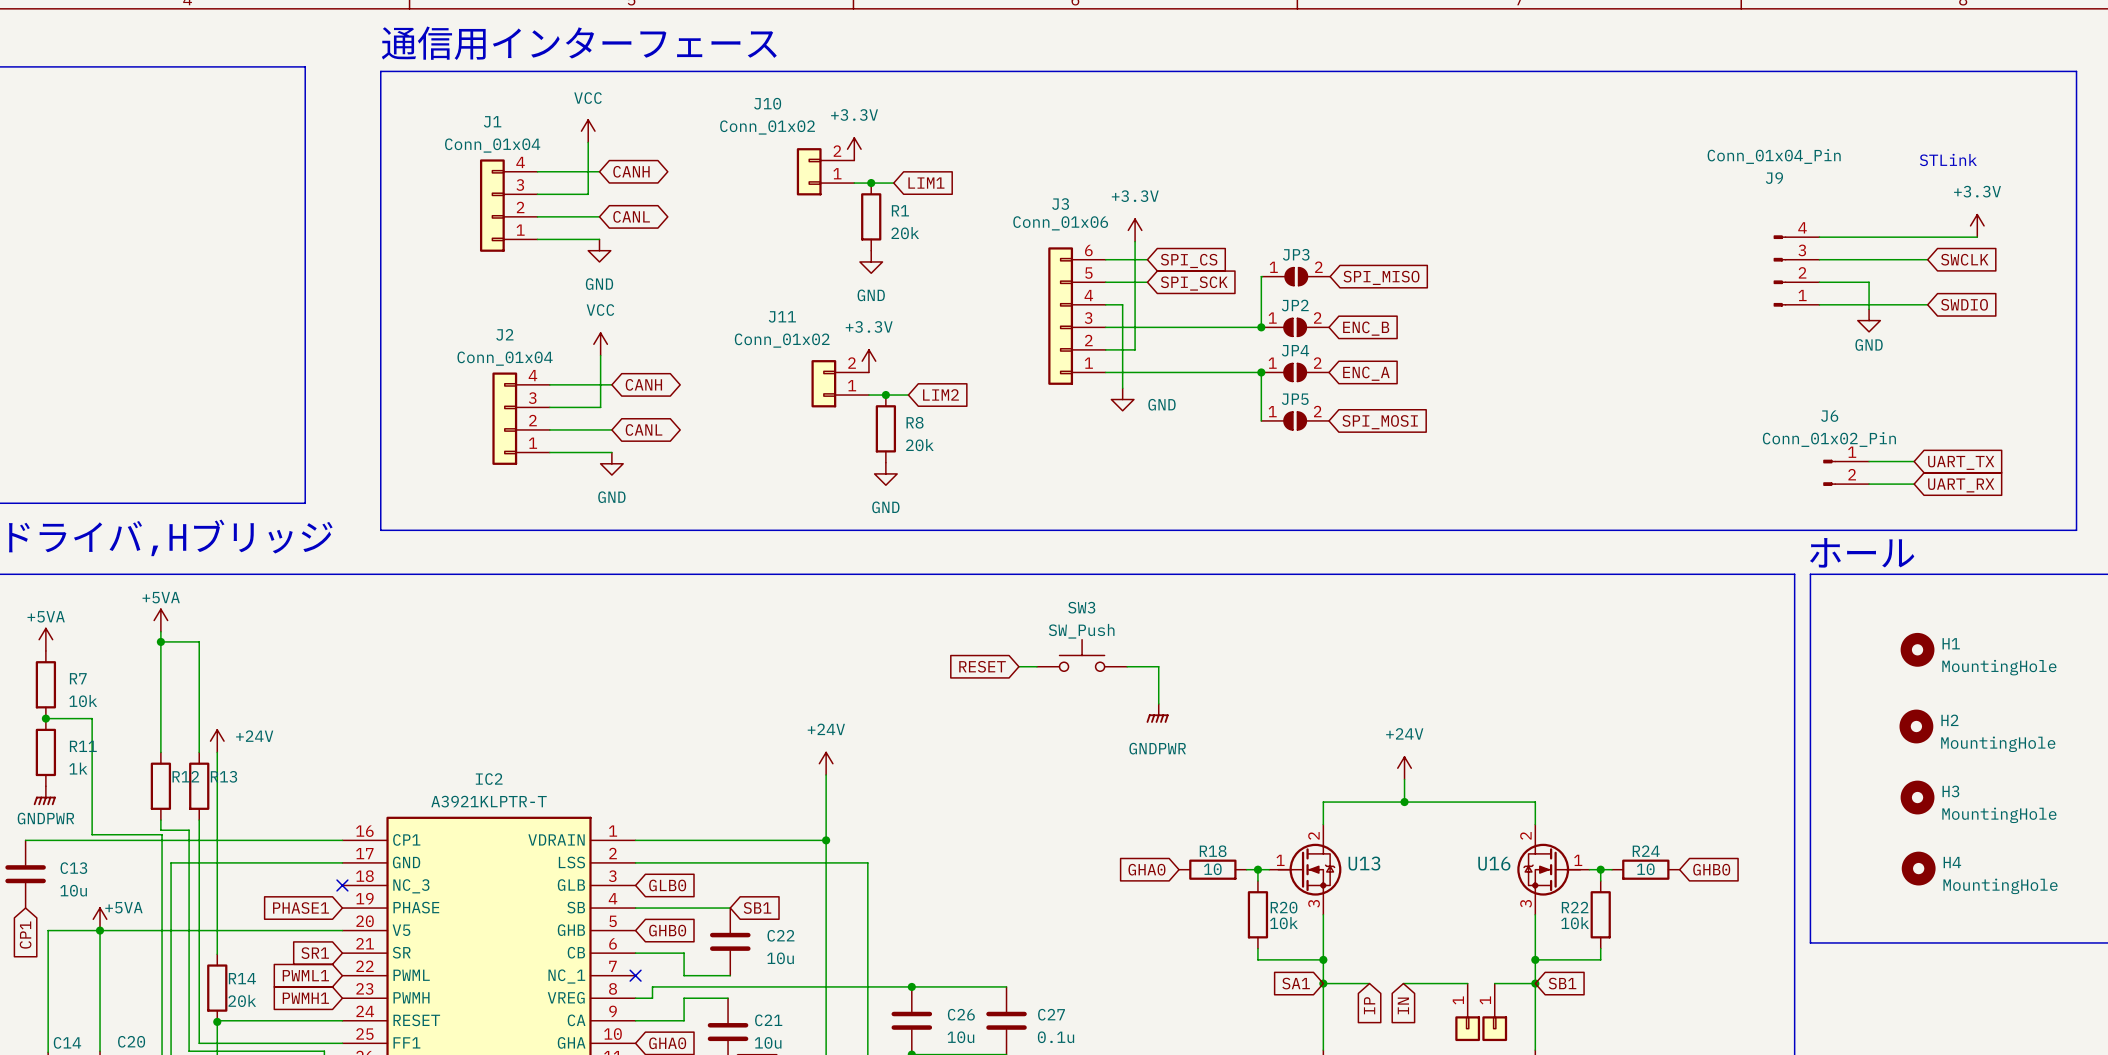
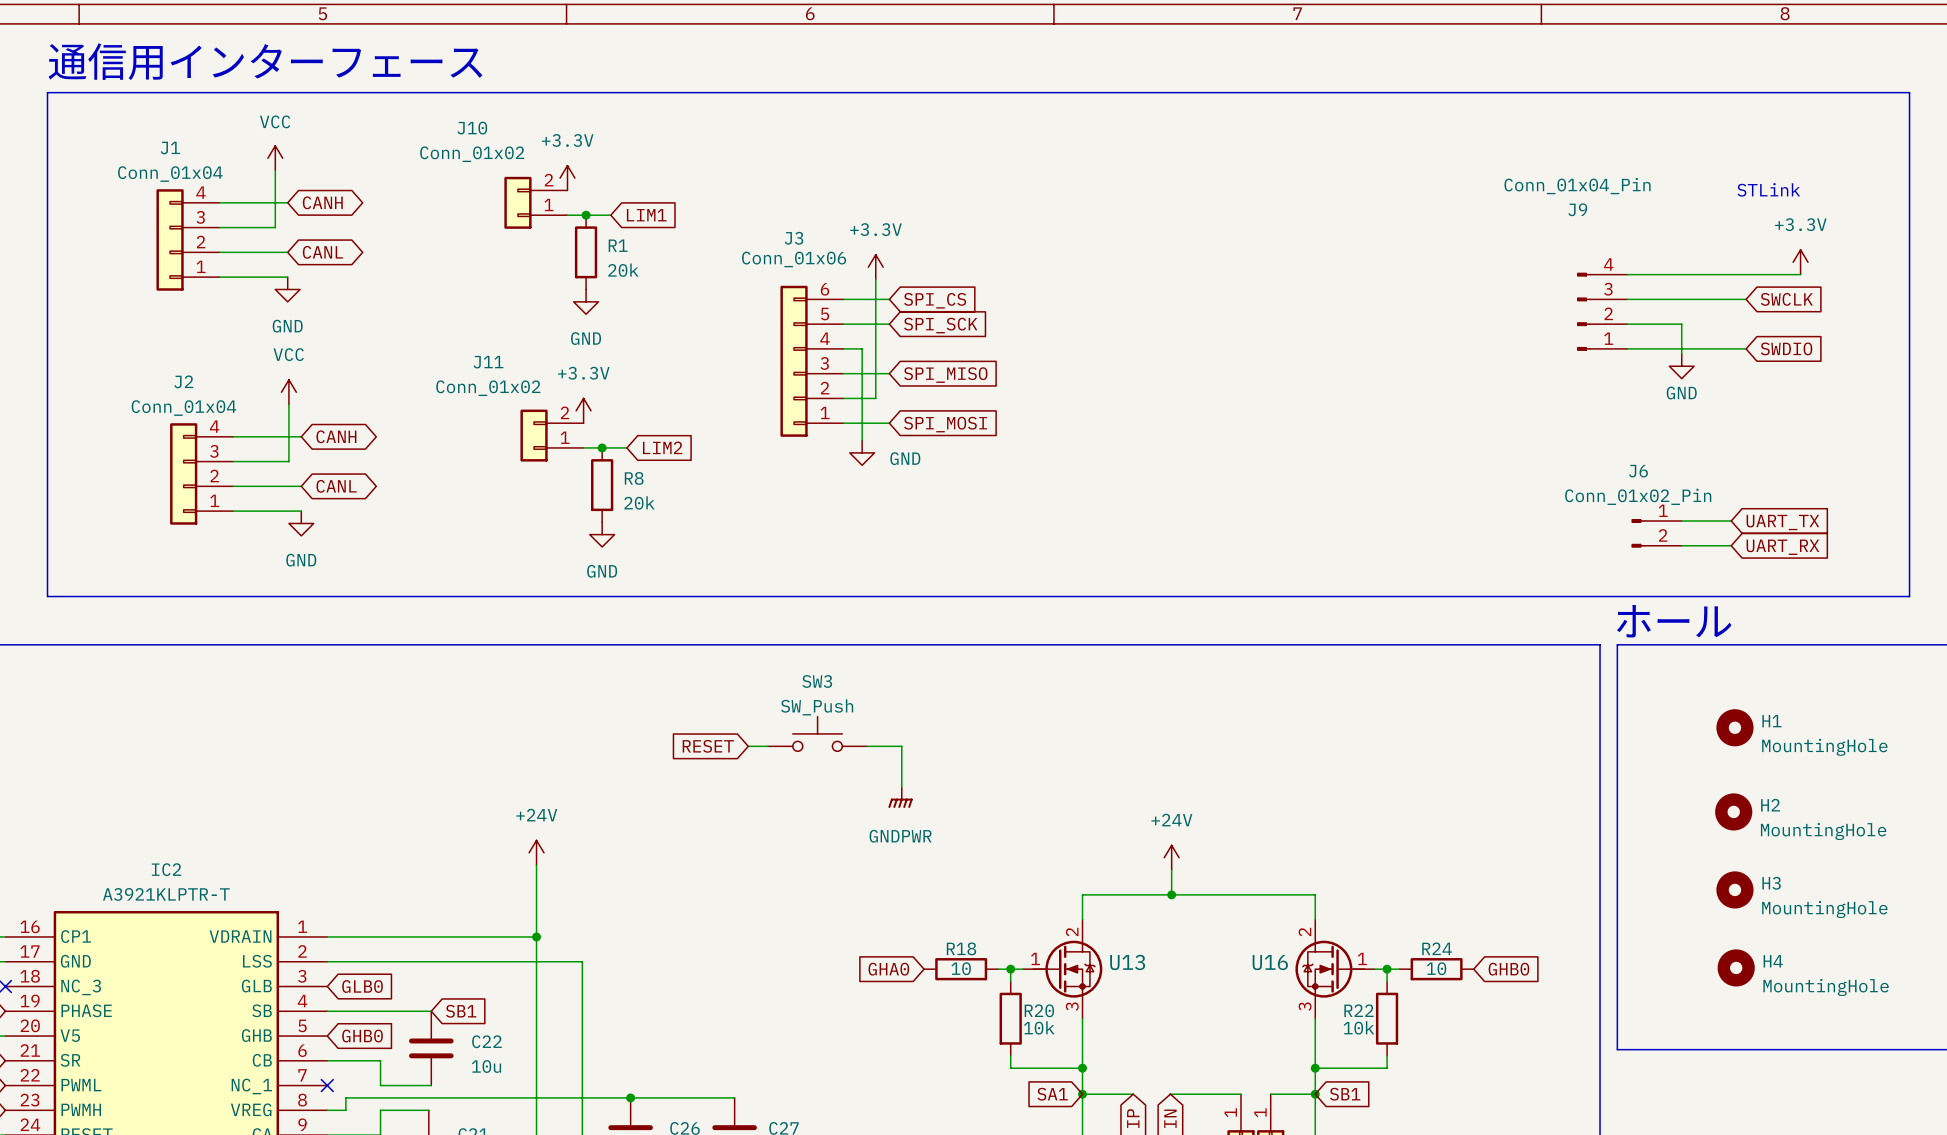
wire: (1262, 276) (1261, 327) (1147, 327) -> none
JP3: (1296, 276) -> none
global label position: SPI_MISO (1381, 277) -> SPI_MISO (945, 375)
junction: (1261, 327) -> none
JP2: (1295, 327) -> none
global label: ENC_B (1366, 328) -> none
wire: (1147, 372) (1261, 372) (1261, 420) -> none
junction: (1261, 372) -> none
JP4: (1295, 372) -> none
global label: ENC_A (1366, 373) -> none
JP5: (1295, 420) -> none
global label position: SPI_MOSI (1380, 422) -> SPI_MOSI (945, 424)

